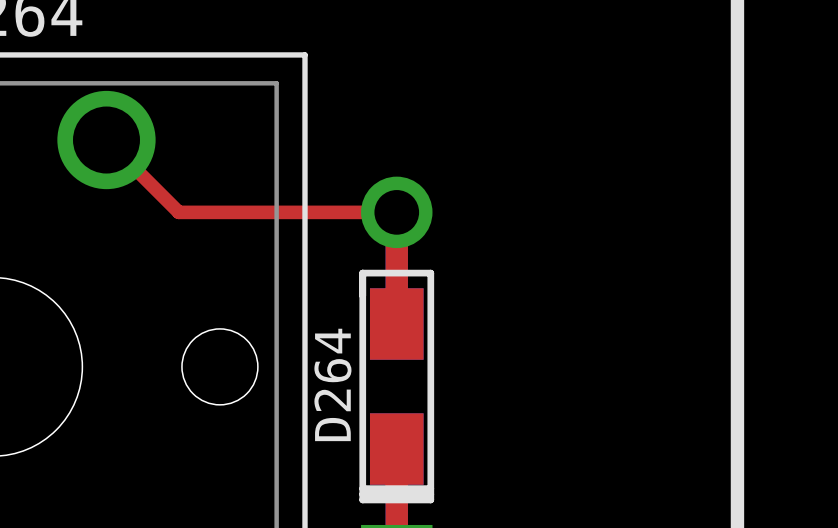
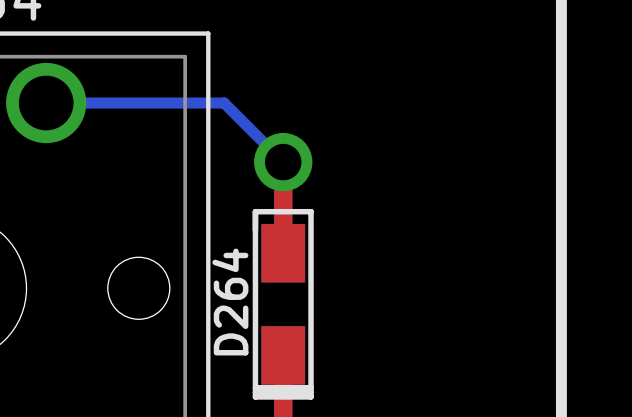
top track: (106, 140) (178, 212) (396, 212) -> none
bottom track: none -> (46, 103) (224, 103) (283, 162)

